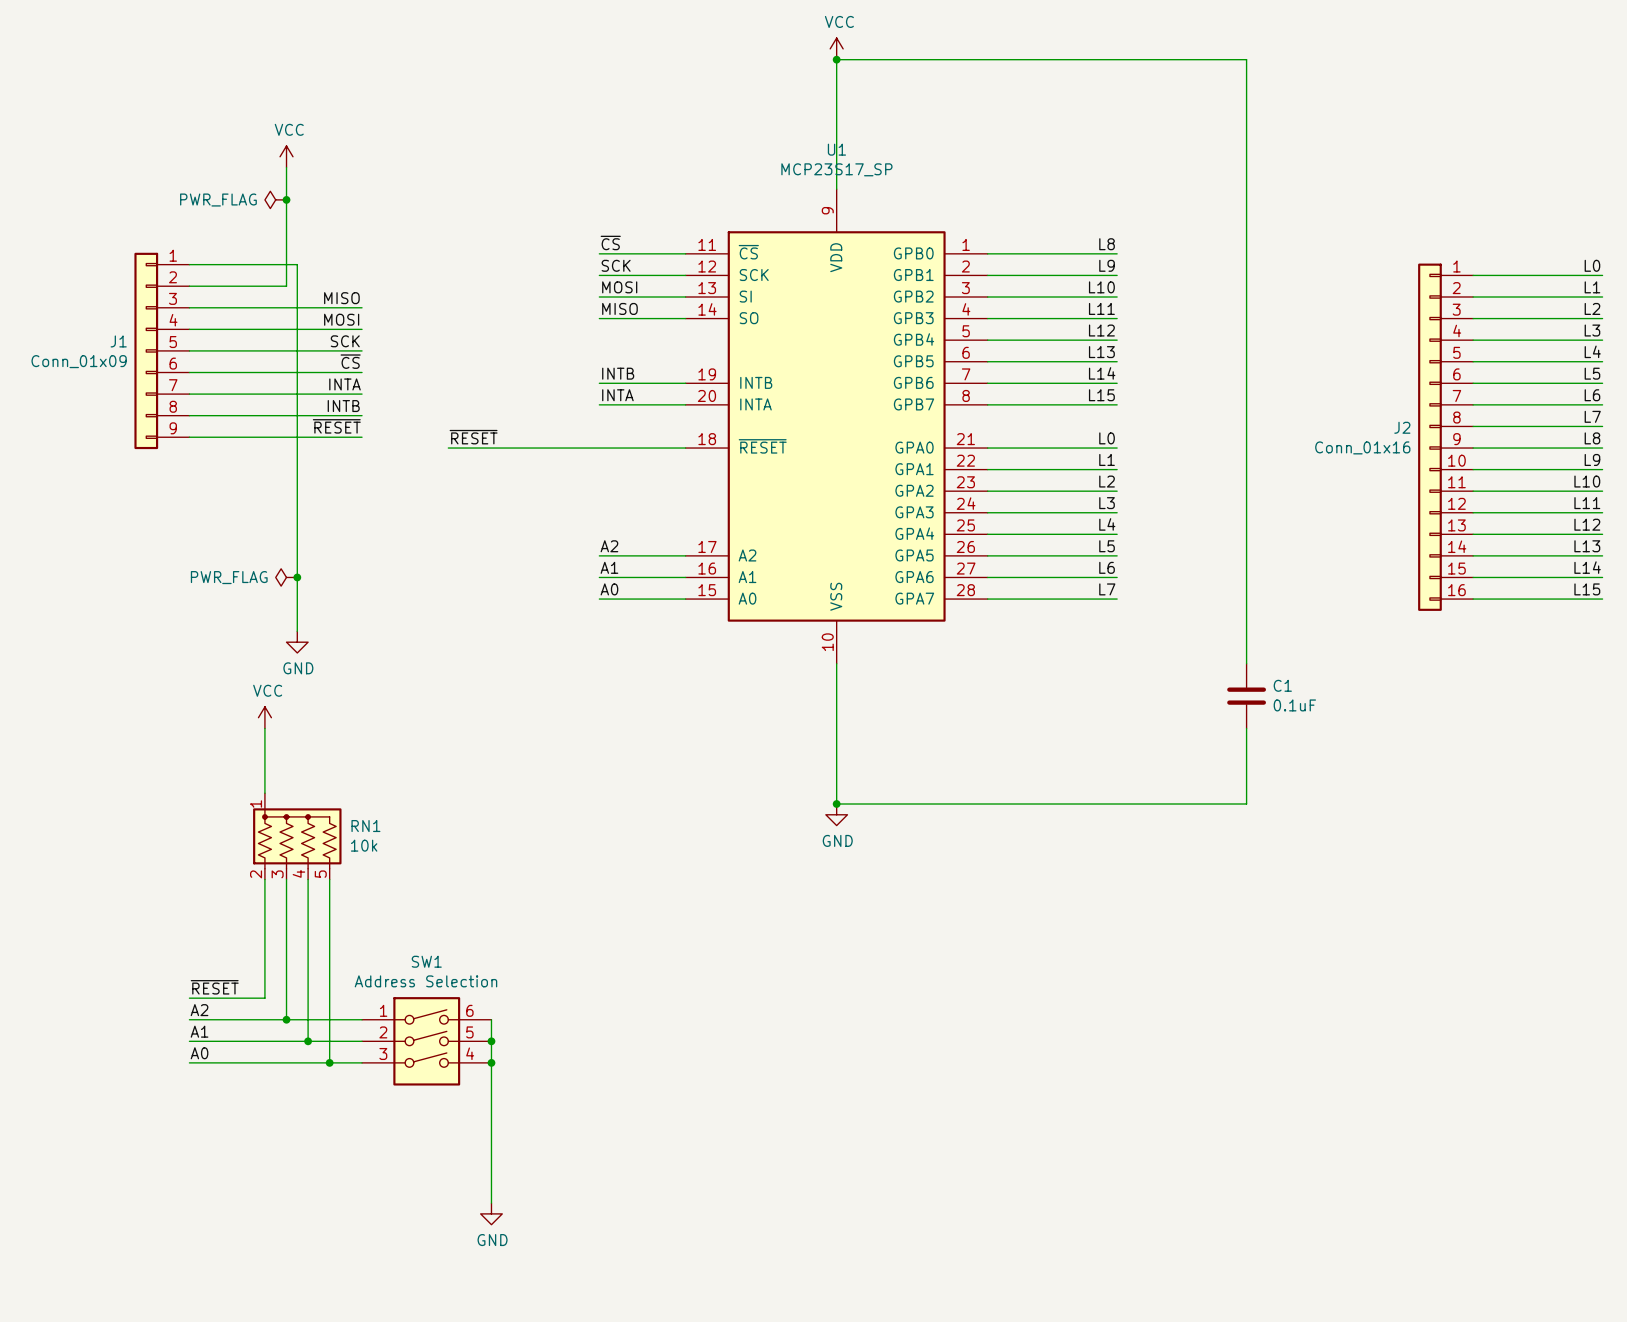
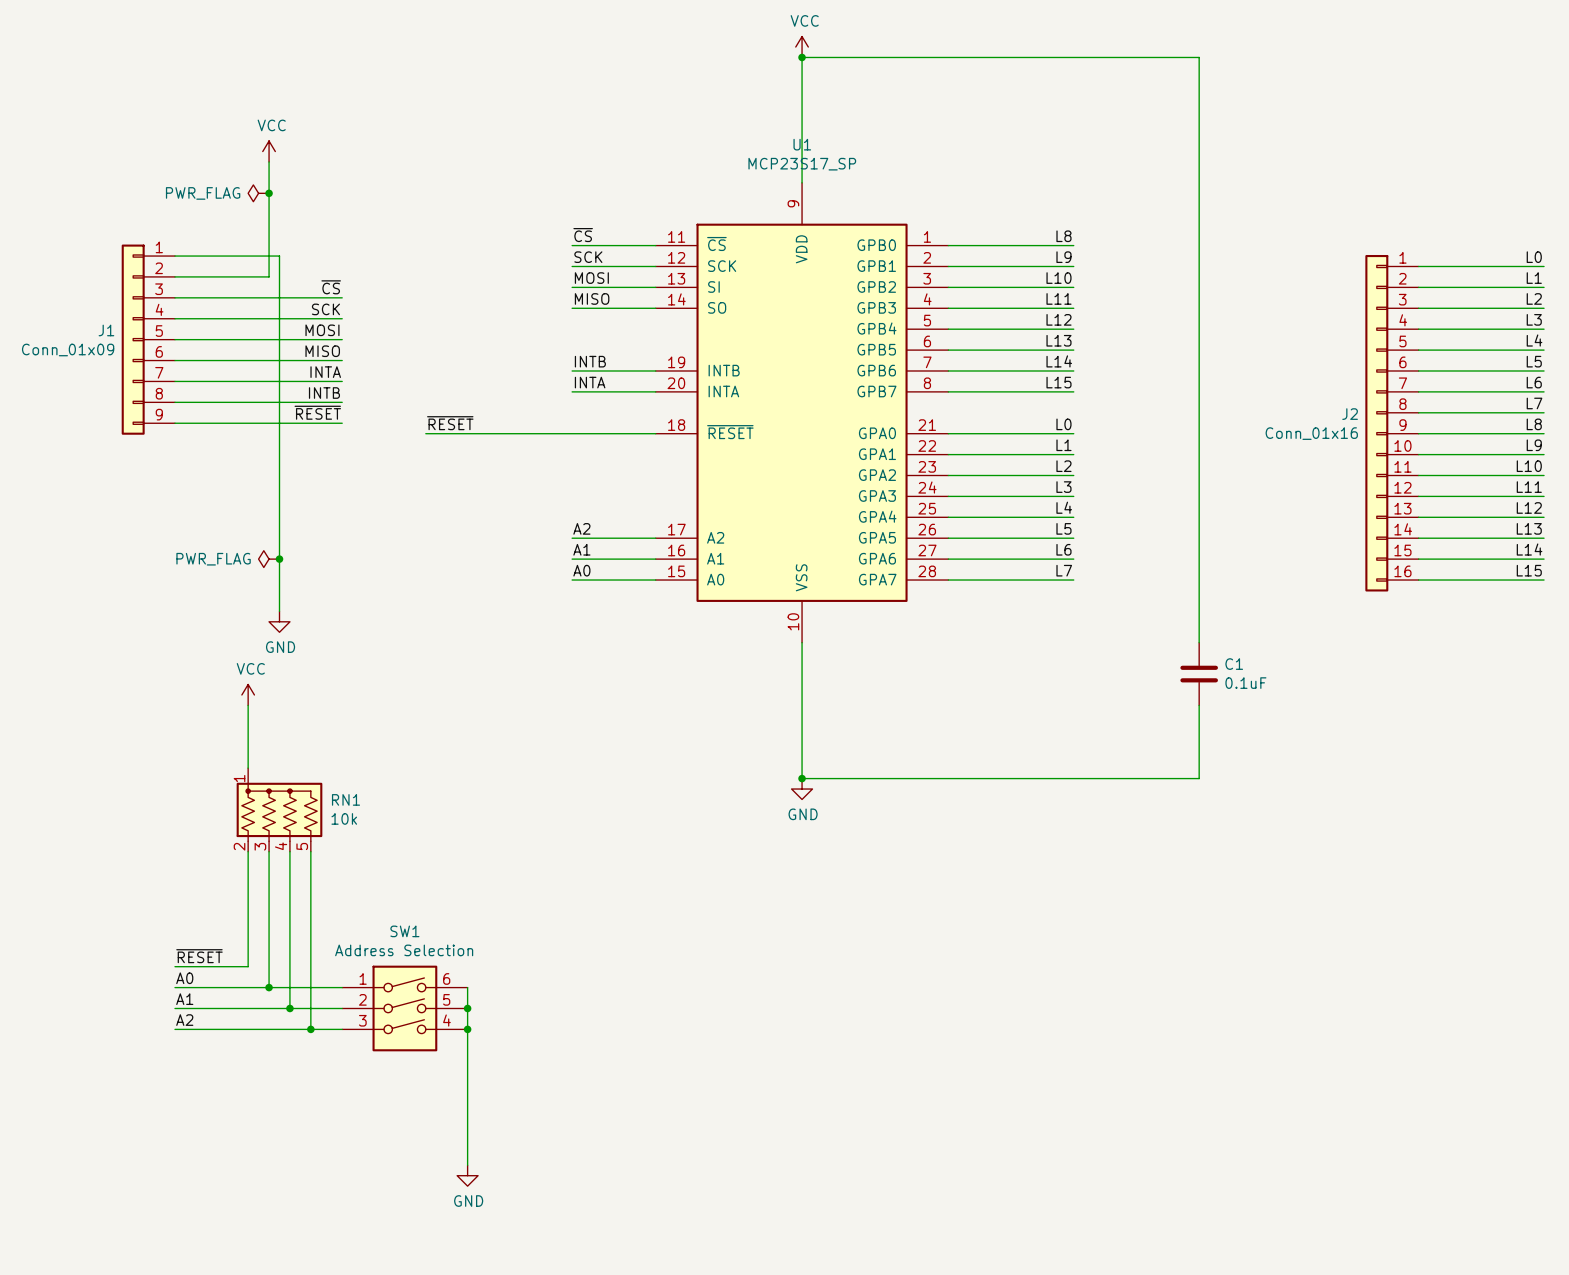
label: MISO (341, 298) -> ~{CS} (331, 287)
label: MOSI (341, 319) -> SCK (325, 309)
label: SCK (345, 341) -> MOSI (322, 330)
label: ~{CS} (350, 361) -> MISO (322, 351)
label: A2 (199, 1010) -> A0 (184, 978)
label: A0 (199, 1053) -> A2 (184, 1020)

